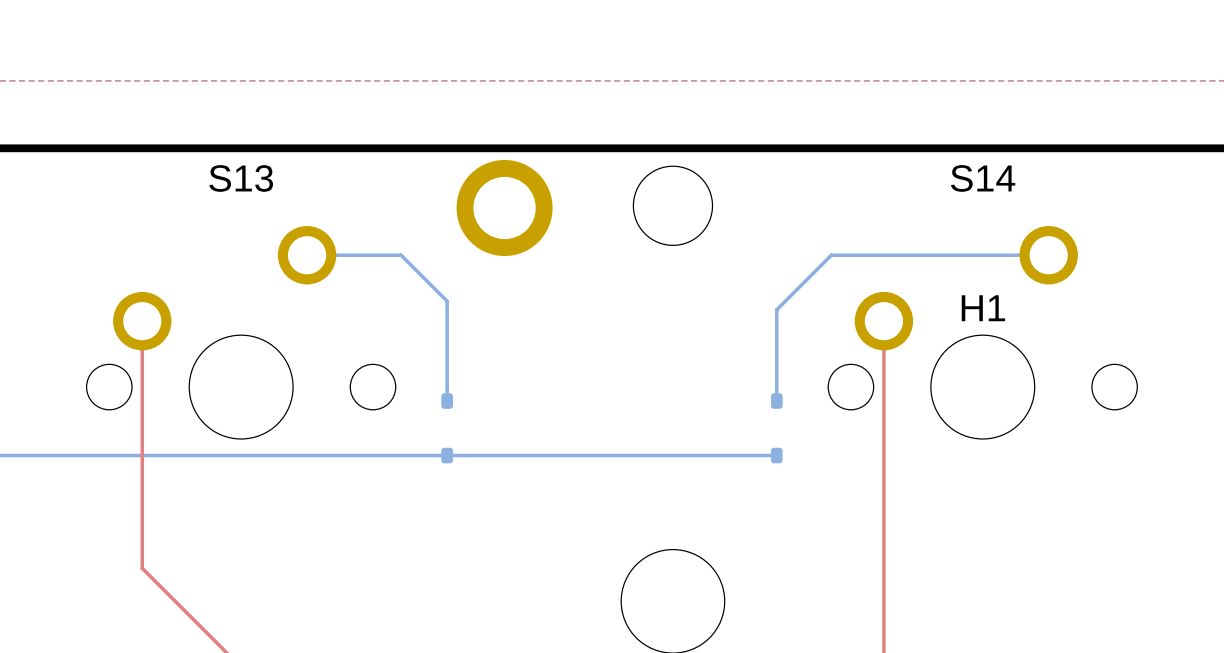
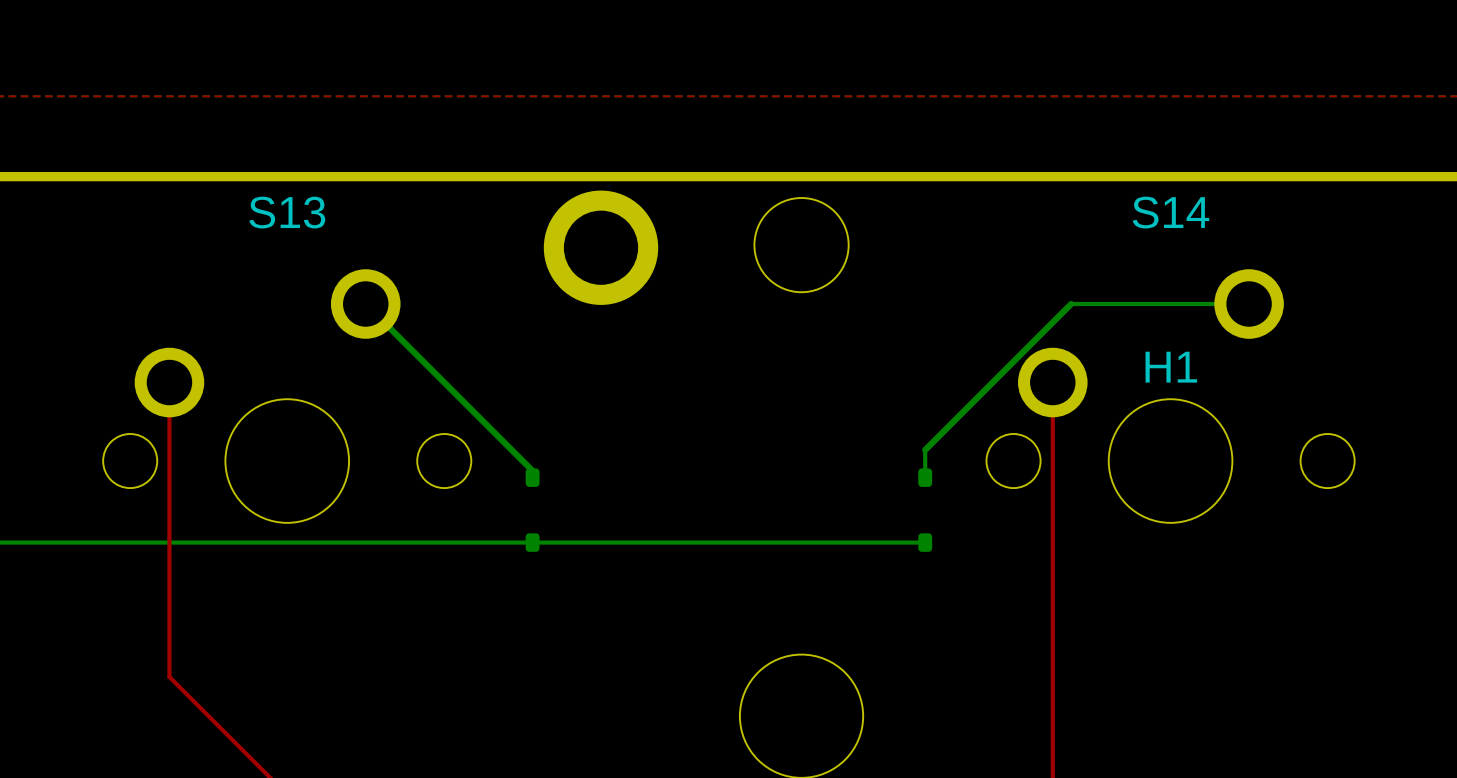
bottom track: (307, 255) (401, 255) (447, 301) (447, 395) -> (365, 304) (532, 470)
bottom track: (899, 255) (831, 255) (776, 309) (776, 377) -> (1071, 304) (925, 450)

